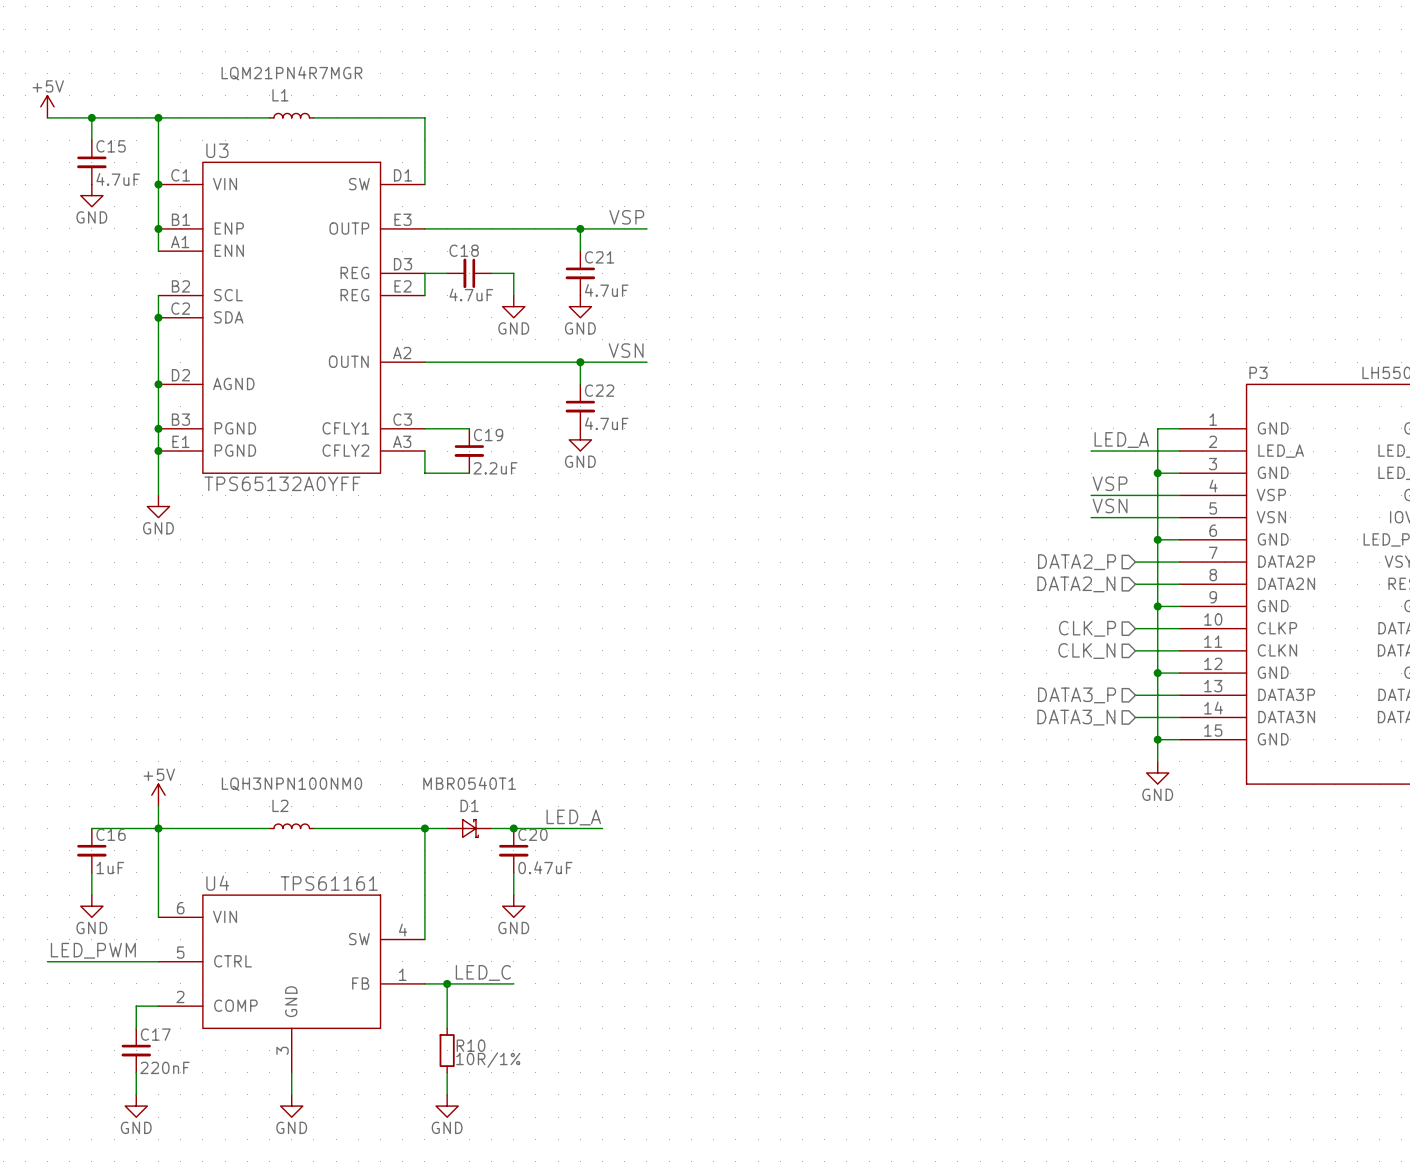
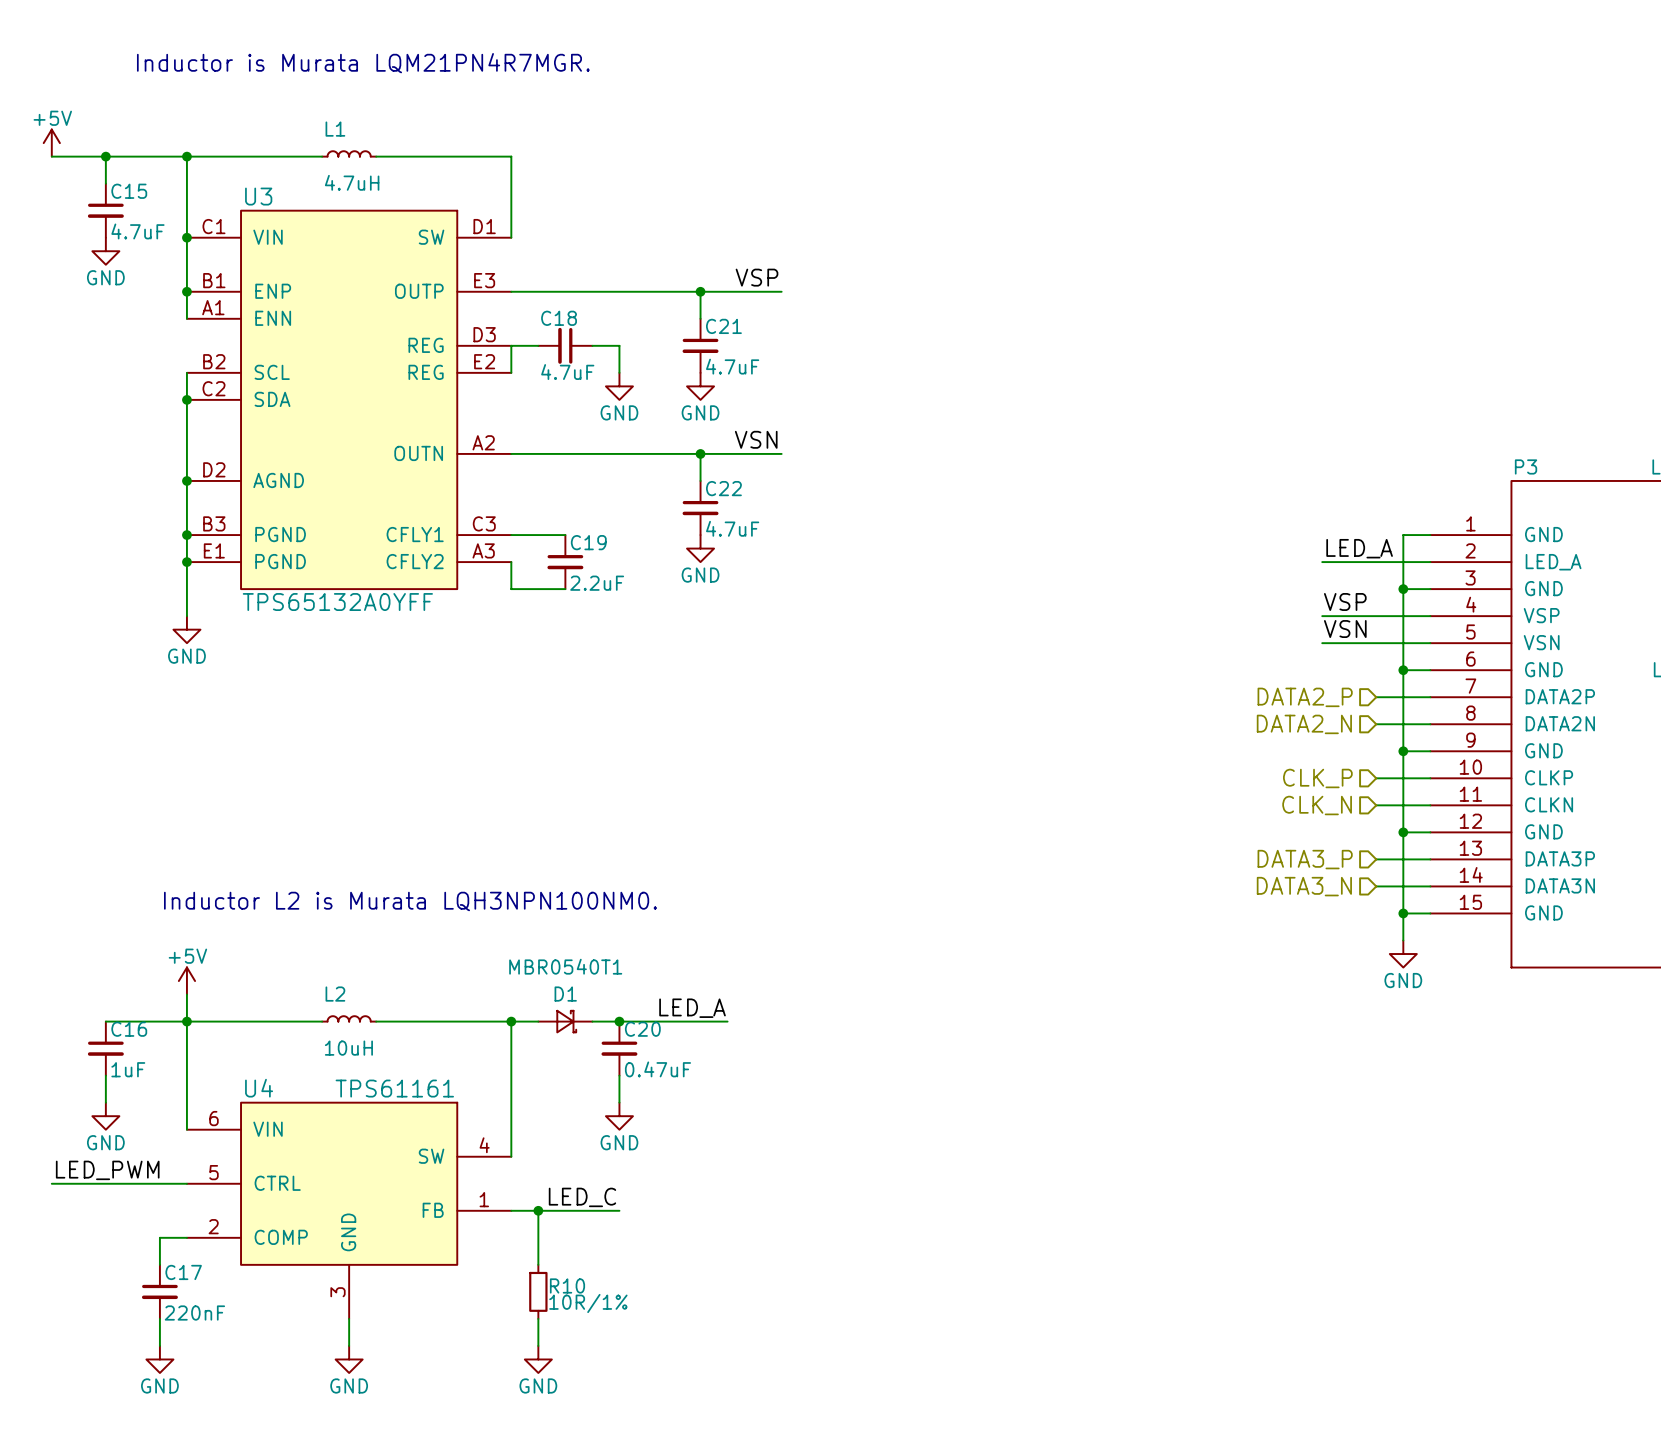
text: none -> Inductor is Murata LQM21PN4R7MGR. (363, 63)
L1 value: LQM21PN4R7MGR (291, 73) -> 4.7uH (352, 182)
text: none -> Inductor L2 is Murata LQH3NPN100NM0. (410, 901)
L2 value: LQH3NPN100NM0 (291, 784) -> 10uH (348, 1048)

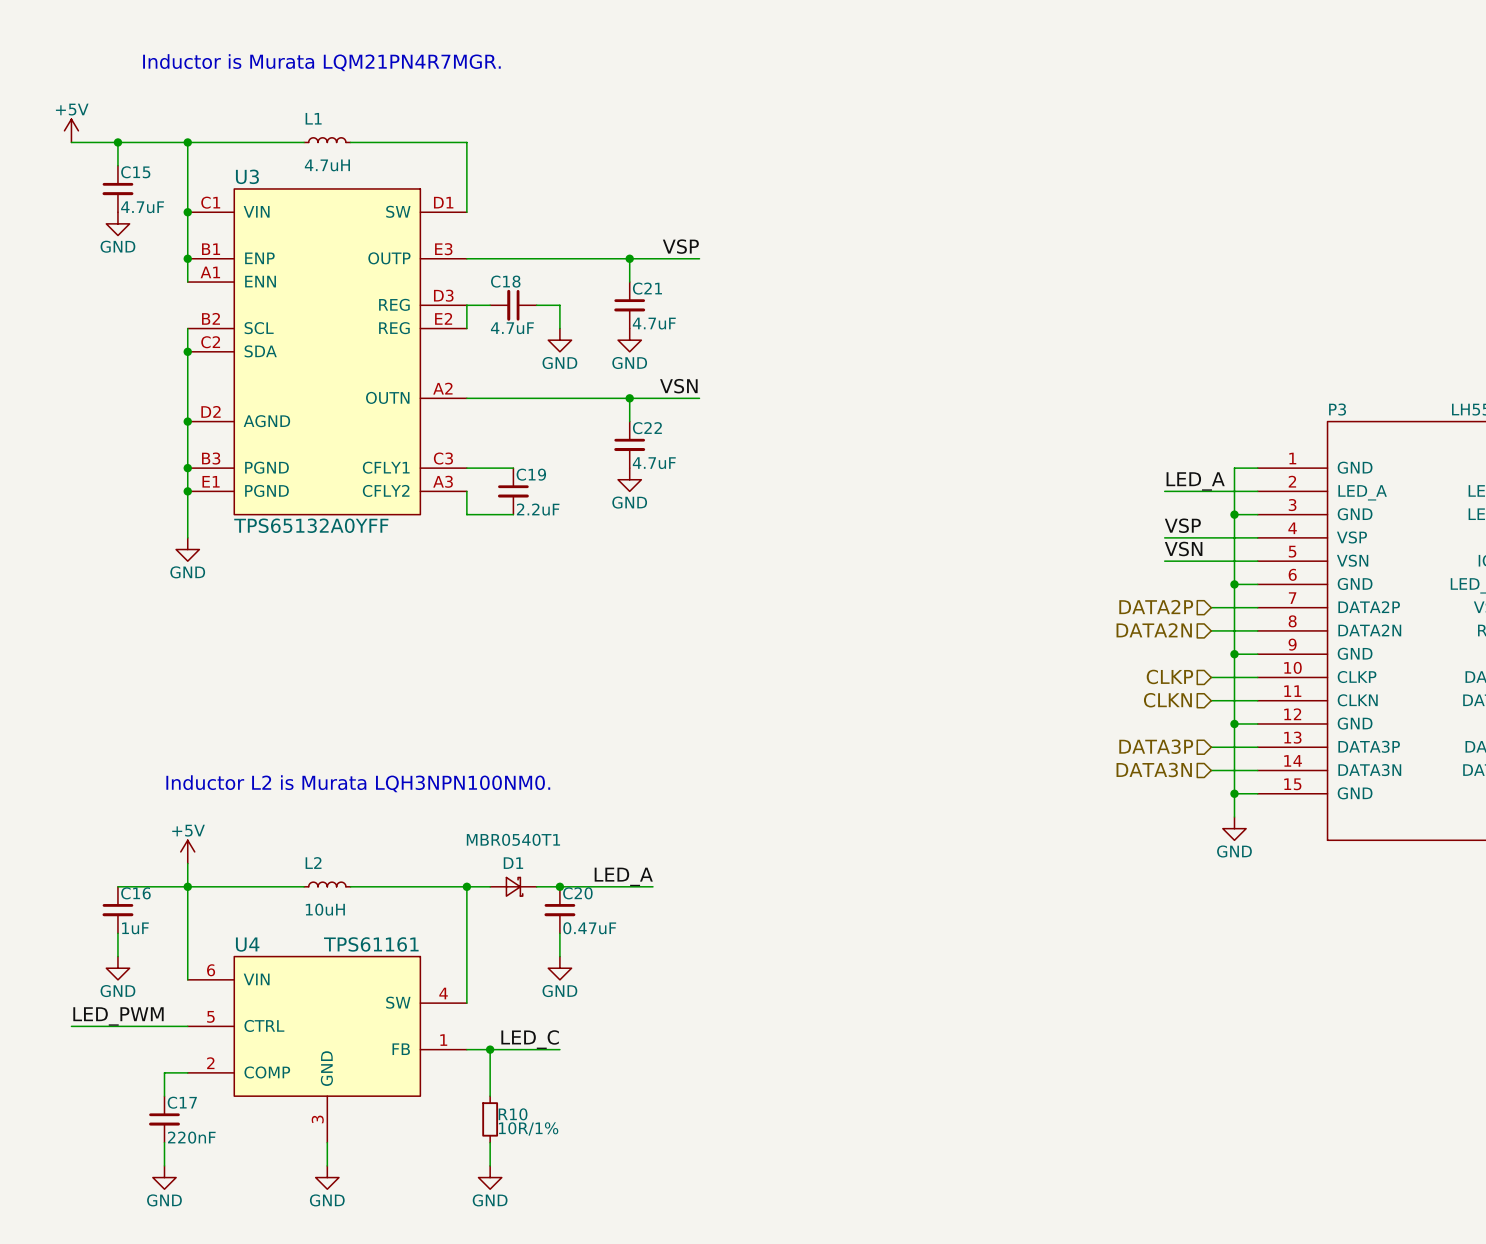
hierarchical label: DATA2_P (1305, 697) -> DATA2P (1156, 607)
hierarchical label: DATA2_N (1304, 724) -> DATA2N (1154, 630)
hierarchical label: CLK_P (1317, 778) -> CLKP (1169, 676)
hierarchical label: CLK_N (1317, 805) -> CLKN (1167, 700)
hierarchical label: DATA3_P (1305, 859) -> DATA3P (1156, 746)
hierarchical label: DATA3_N (1304, 886) -> DATA3N (1154, 769)

